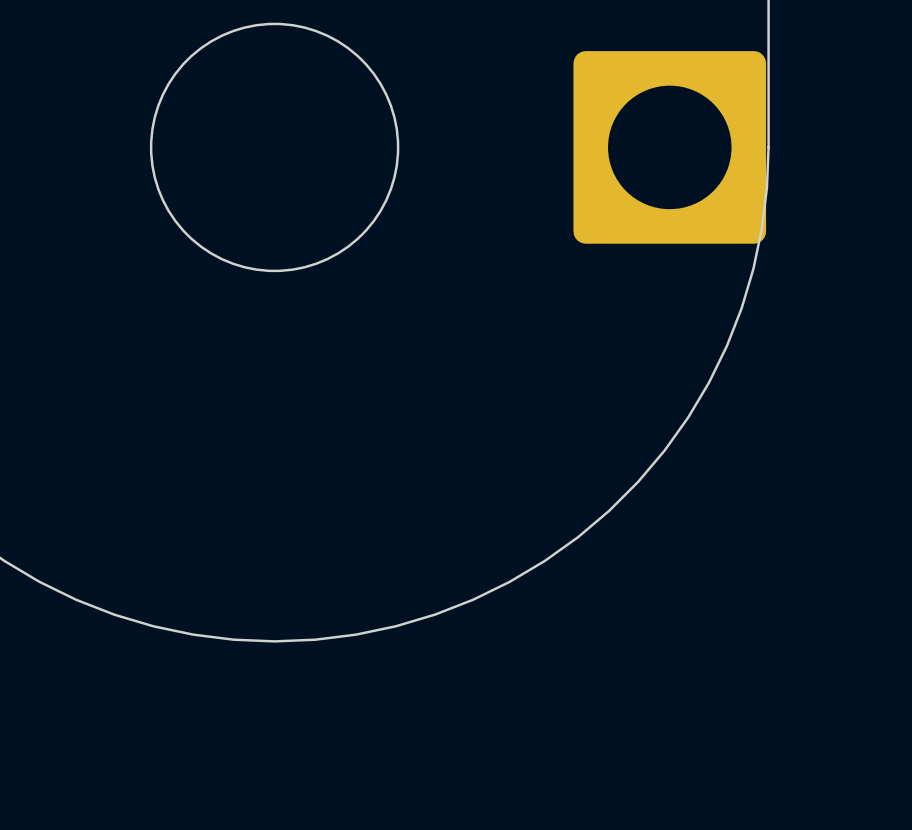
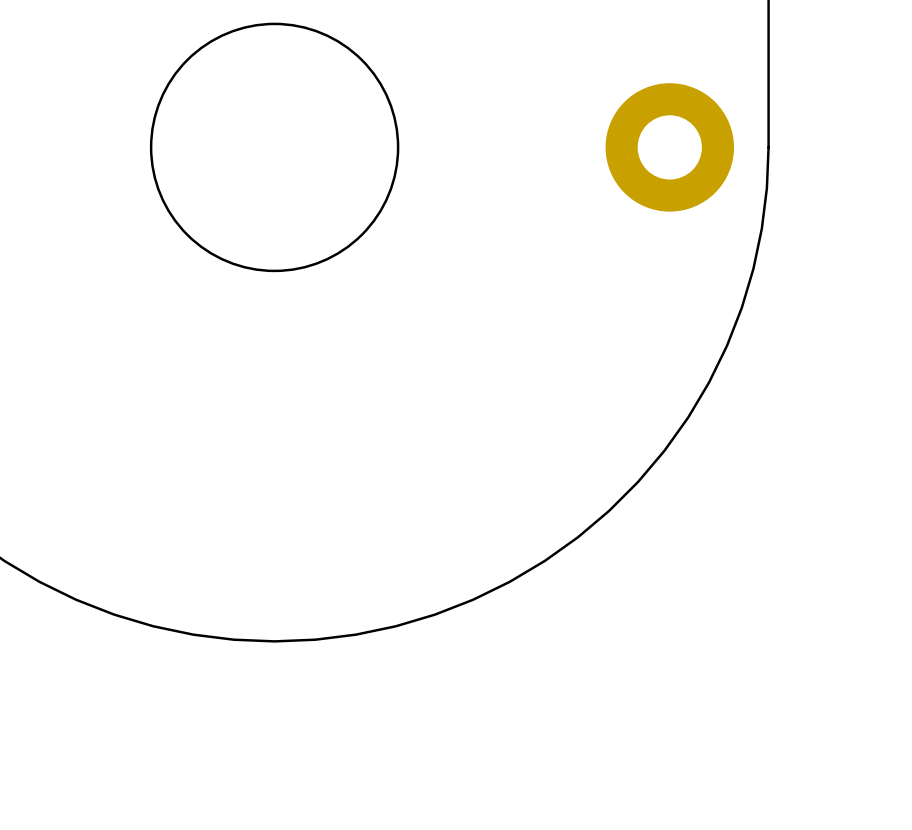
part footprint: [573, 51, 767, 244] -> [605, 83, 735, 212]

